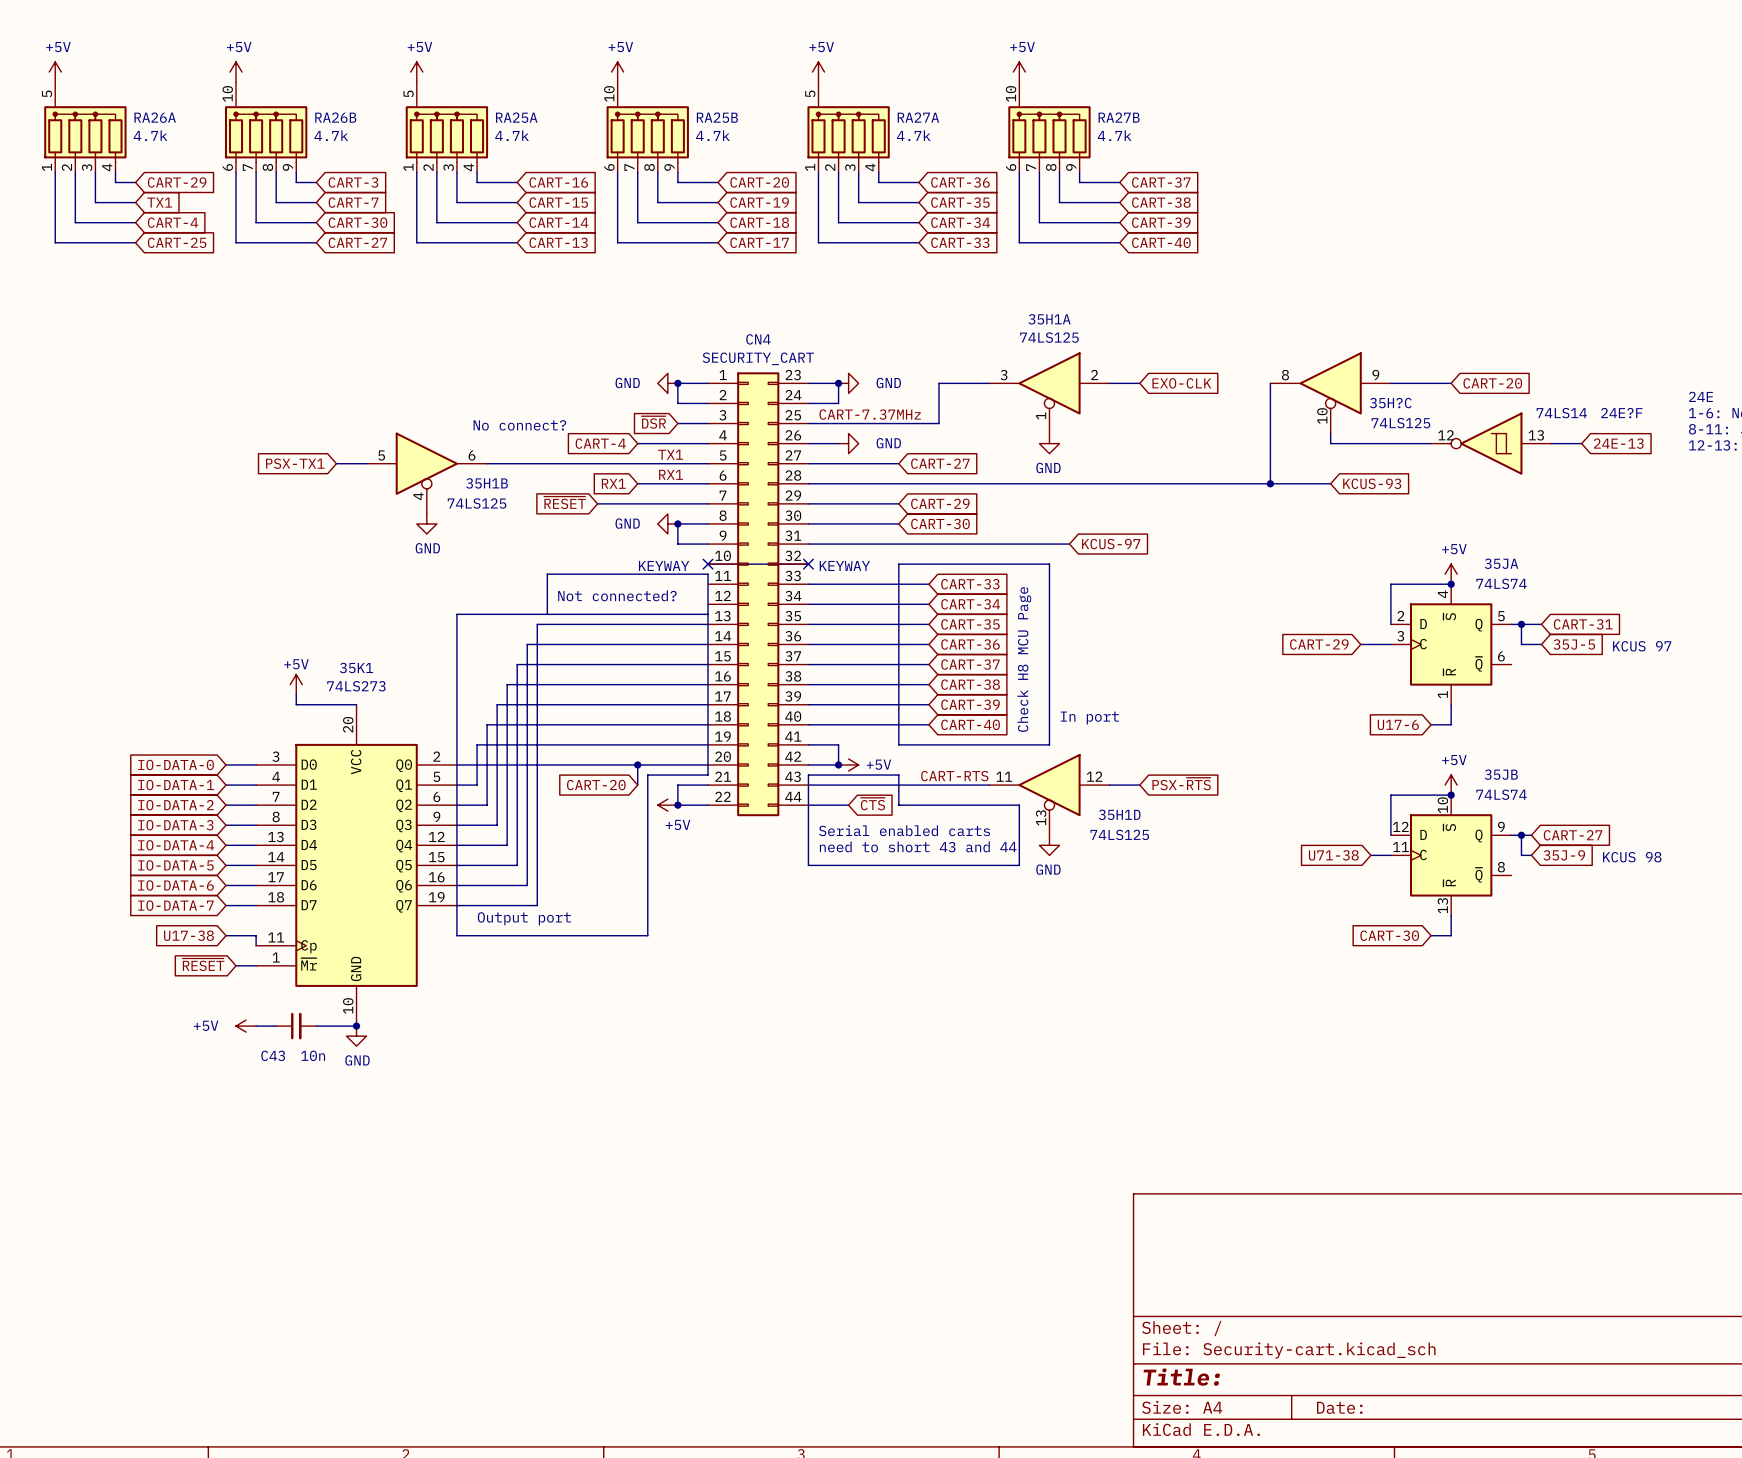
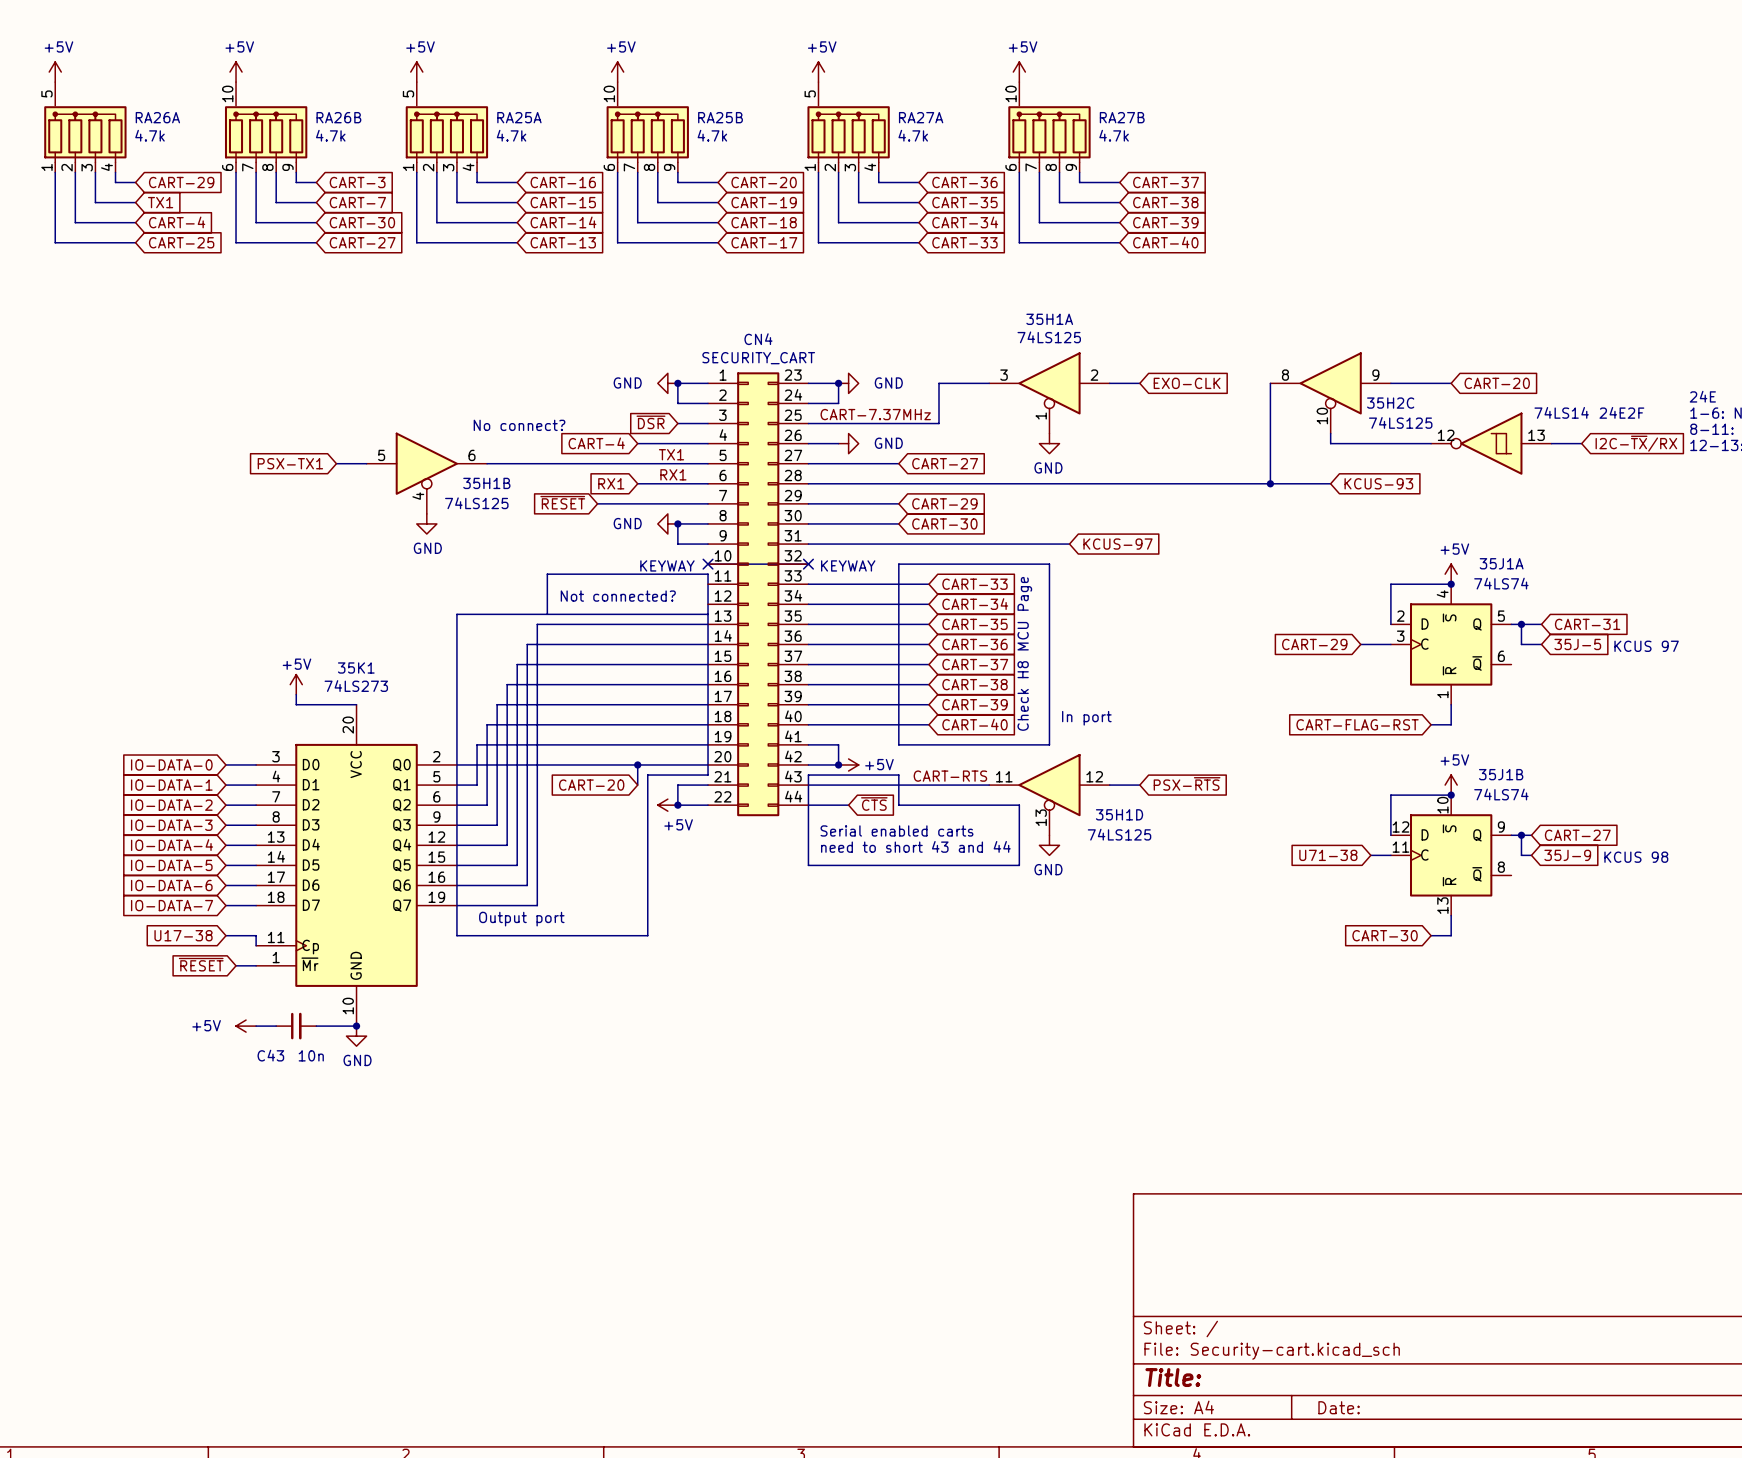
35H?C name: 35H?C (1390, 403) -> 35H2C (1390, 403)
24E?F name: 24E?F (1621, 413) -> 24E2F (1621, 412)
global label: 24E-13 (1618, 443) -> I2C-~{TX}/RX (1636, 443)
35JA name: 35JA (1501, 563) -> 35J1A (1501, 563)
global label: U17-6 (1398, 724) -> CART-FLAG-RST (1357, 724)
35JB name: 35JB (1501, 774) -> 35J1B (1501, 774)

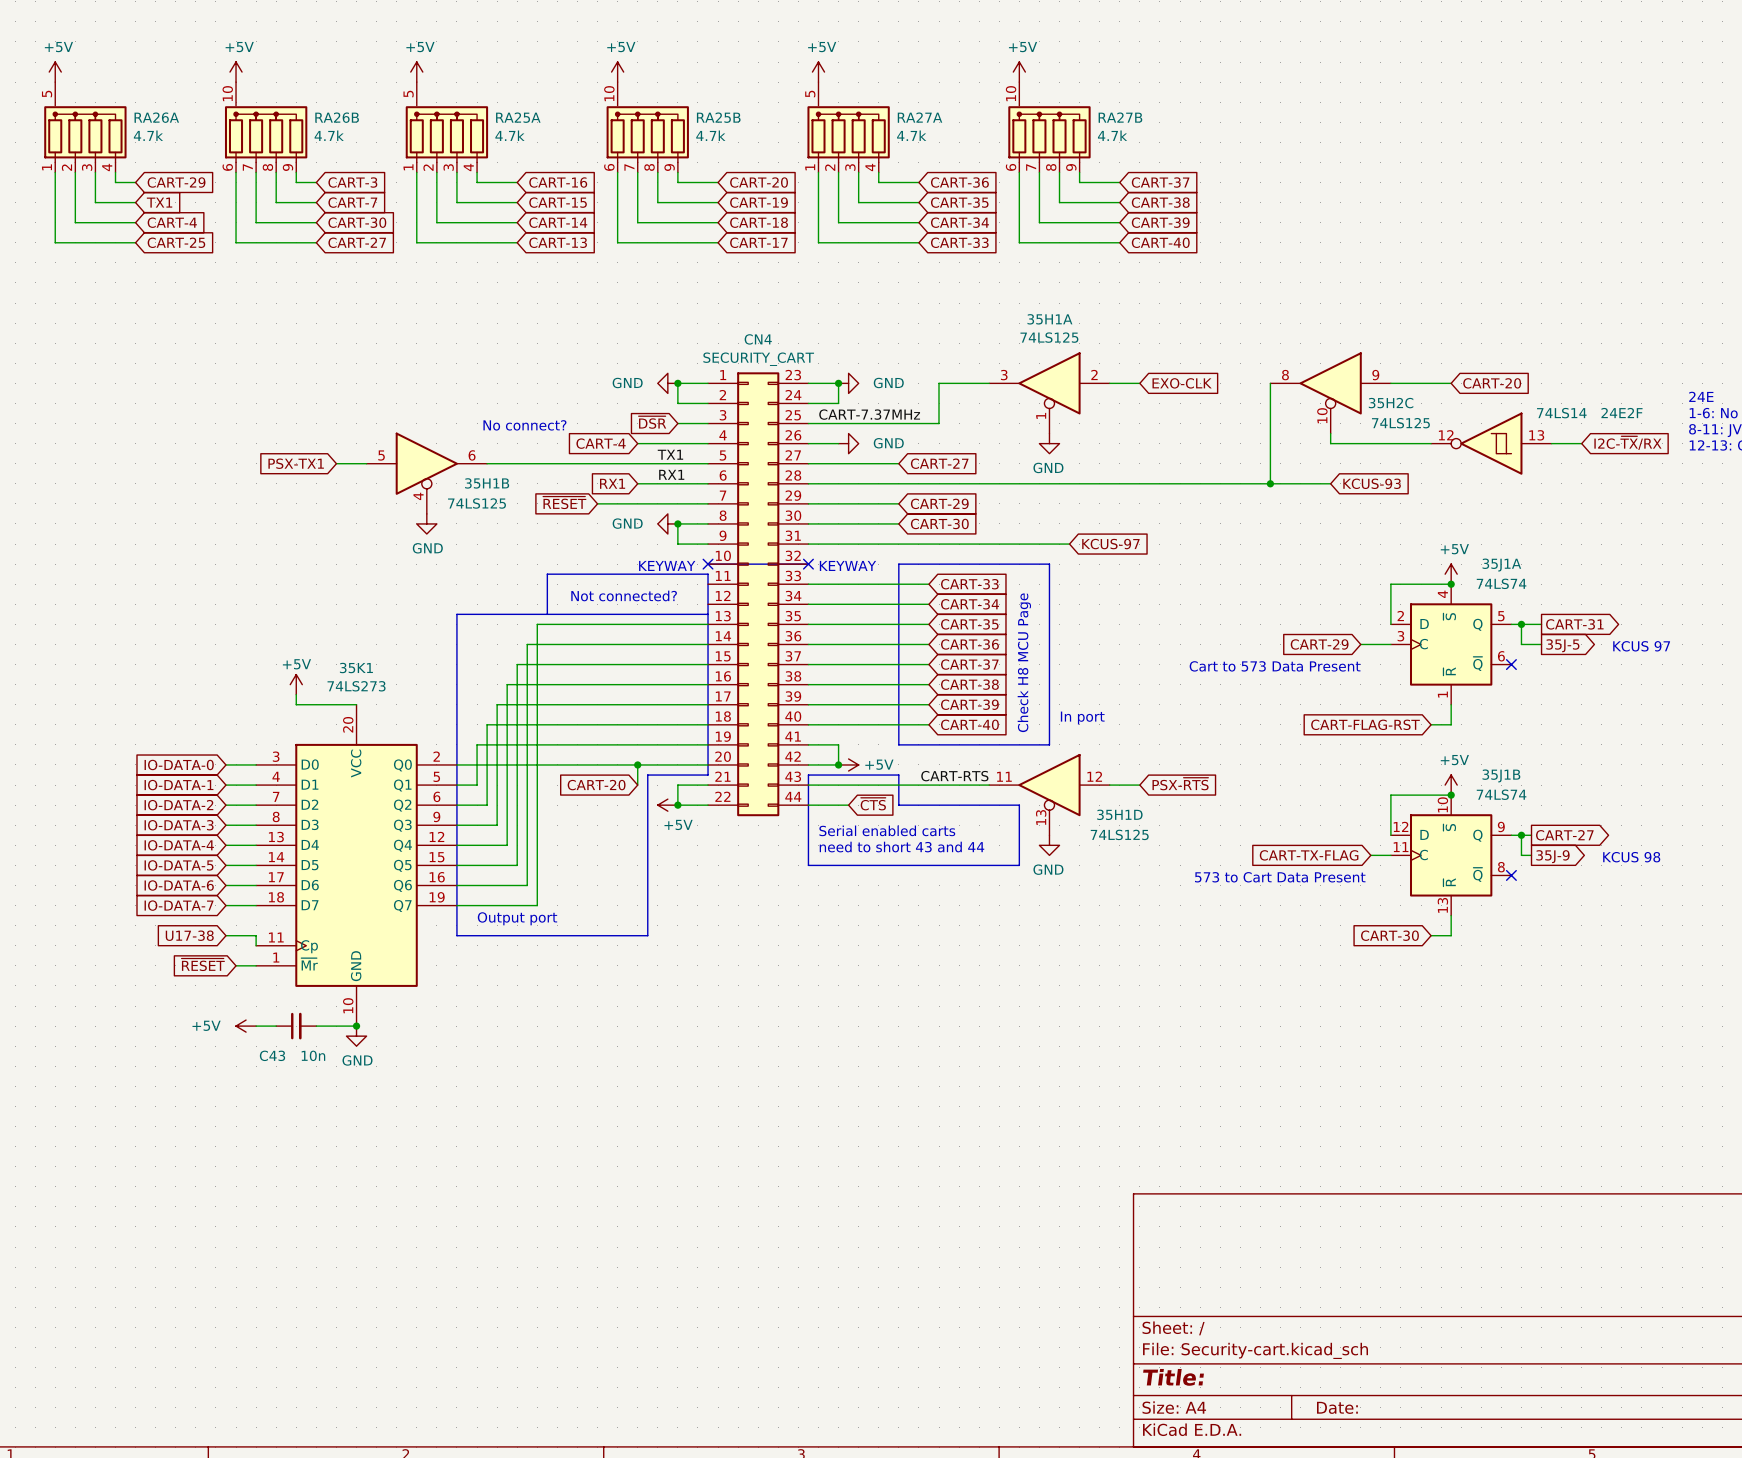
global label shape: input (1587, 624) -> output (1574, 624)
global label shape: input (1577, 644) -> output (1562, 645)
no-connect mark: none -> (1511, 664)
text: none -> Cart to 573 Data Present (1275, 666)
global label shape: input (1577, 835) -> output (1564, 835)
global label: U71-38 (1328, 855) -> CART-TX-FLAG (1309, 855)
global label shape: input (1567, 855) -> output (1552, 856)
no-connect mark: none -> (1511, 875)
text: none -> 573 to Cart Data Present (1280, 877)

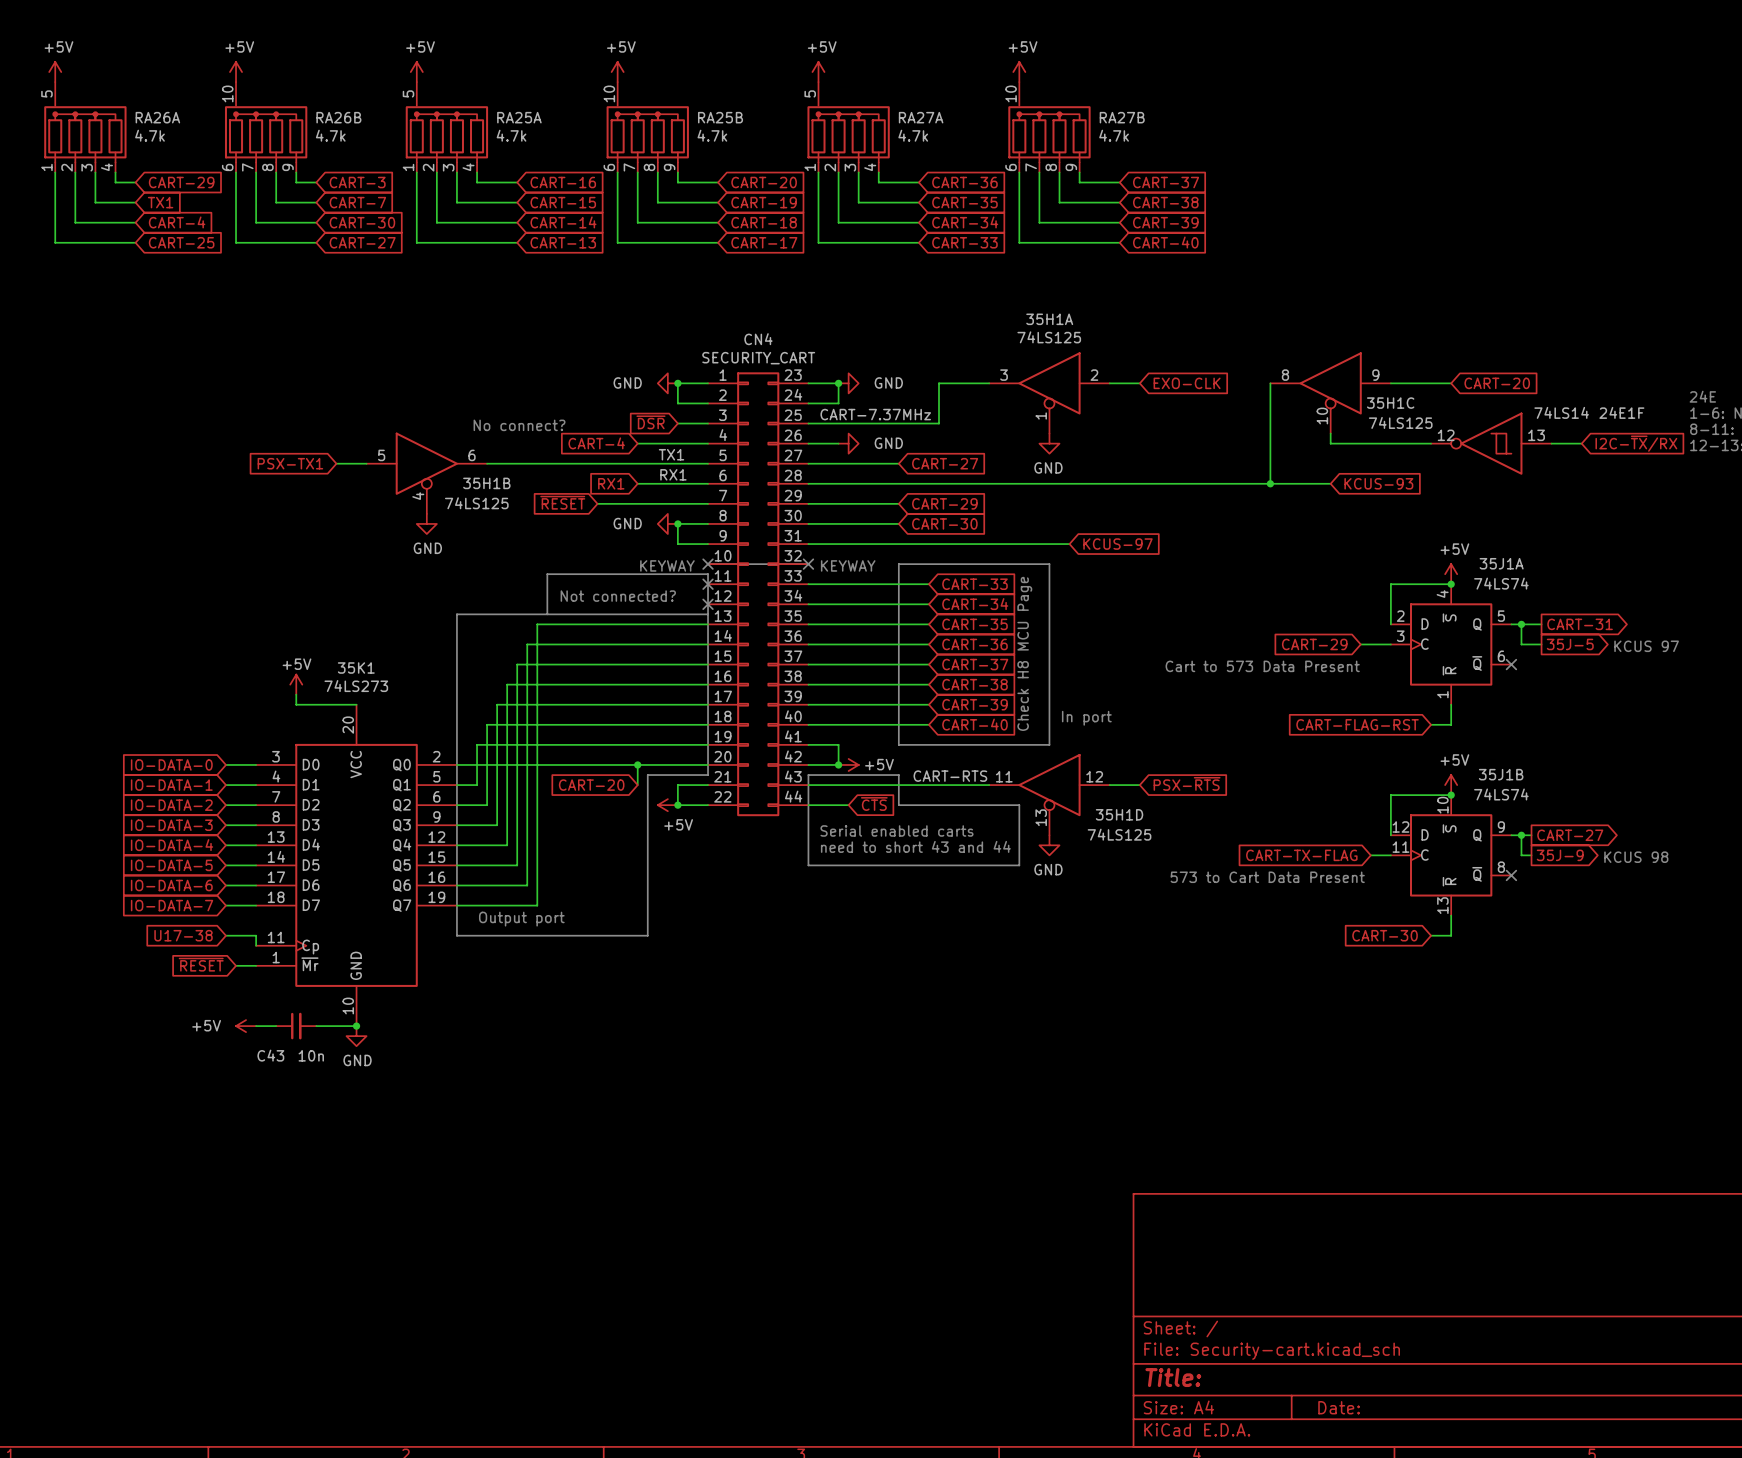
35H2C name: 35H2C (1391, 403) -> 35H1C (1390, 403)
24E2F name: 24E2F (1622, 413) -> 24E1F (1621, 412)
no-connect mark: none -> (708, 584)
no-connect mark: none -> (708, 604)

